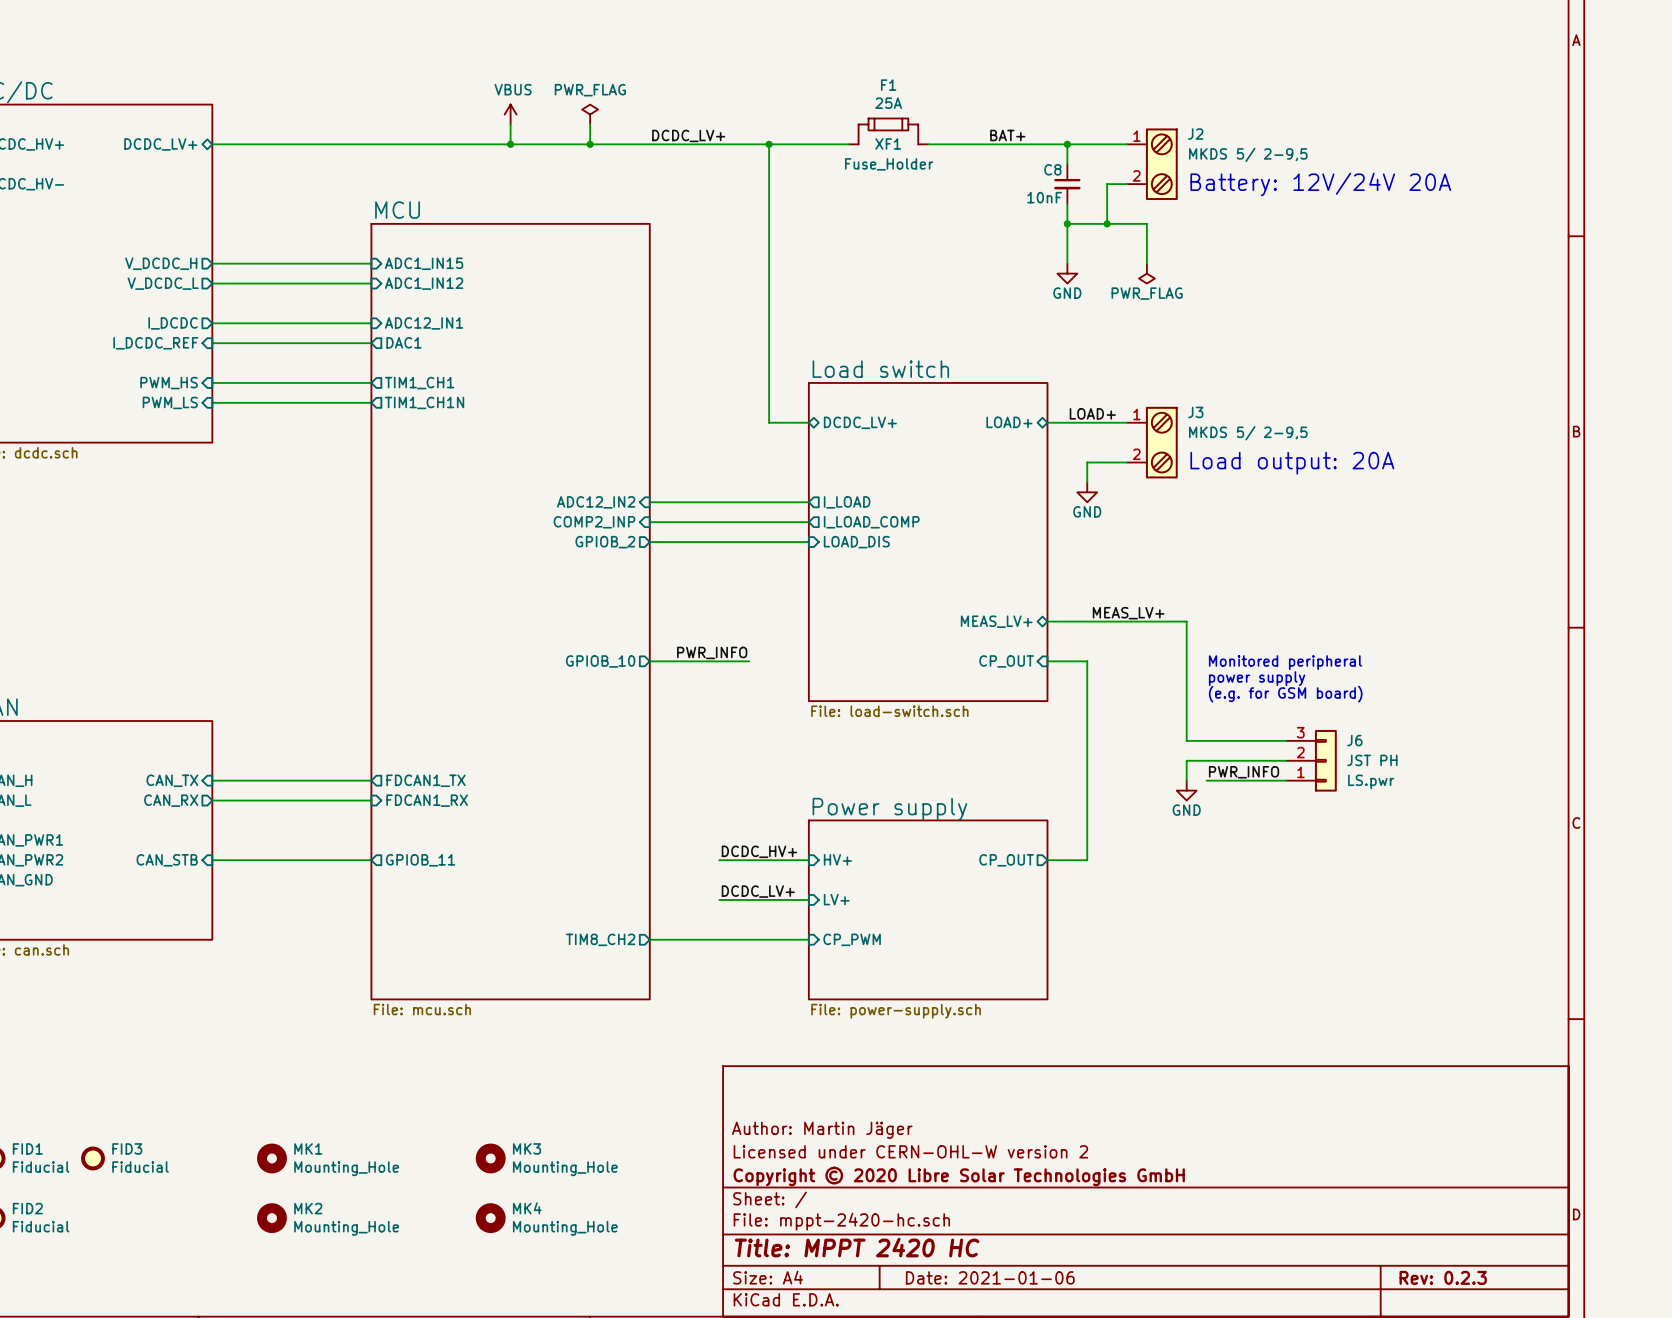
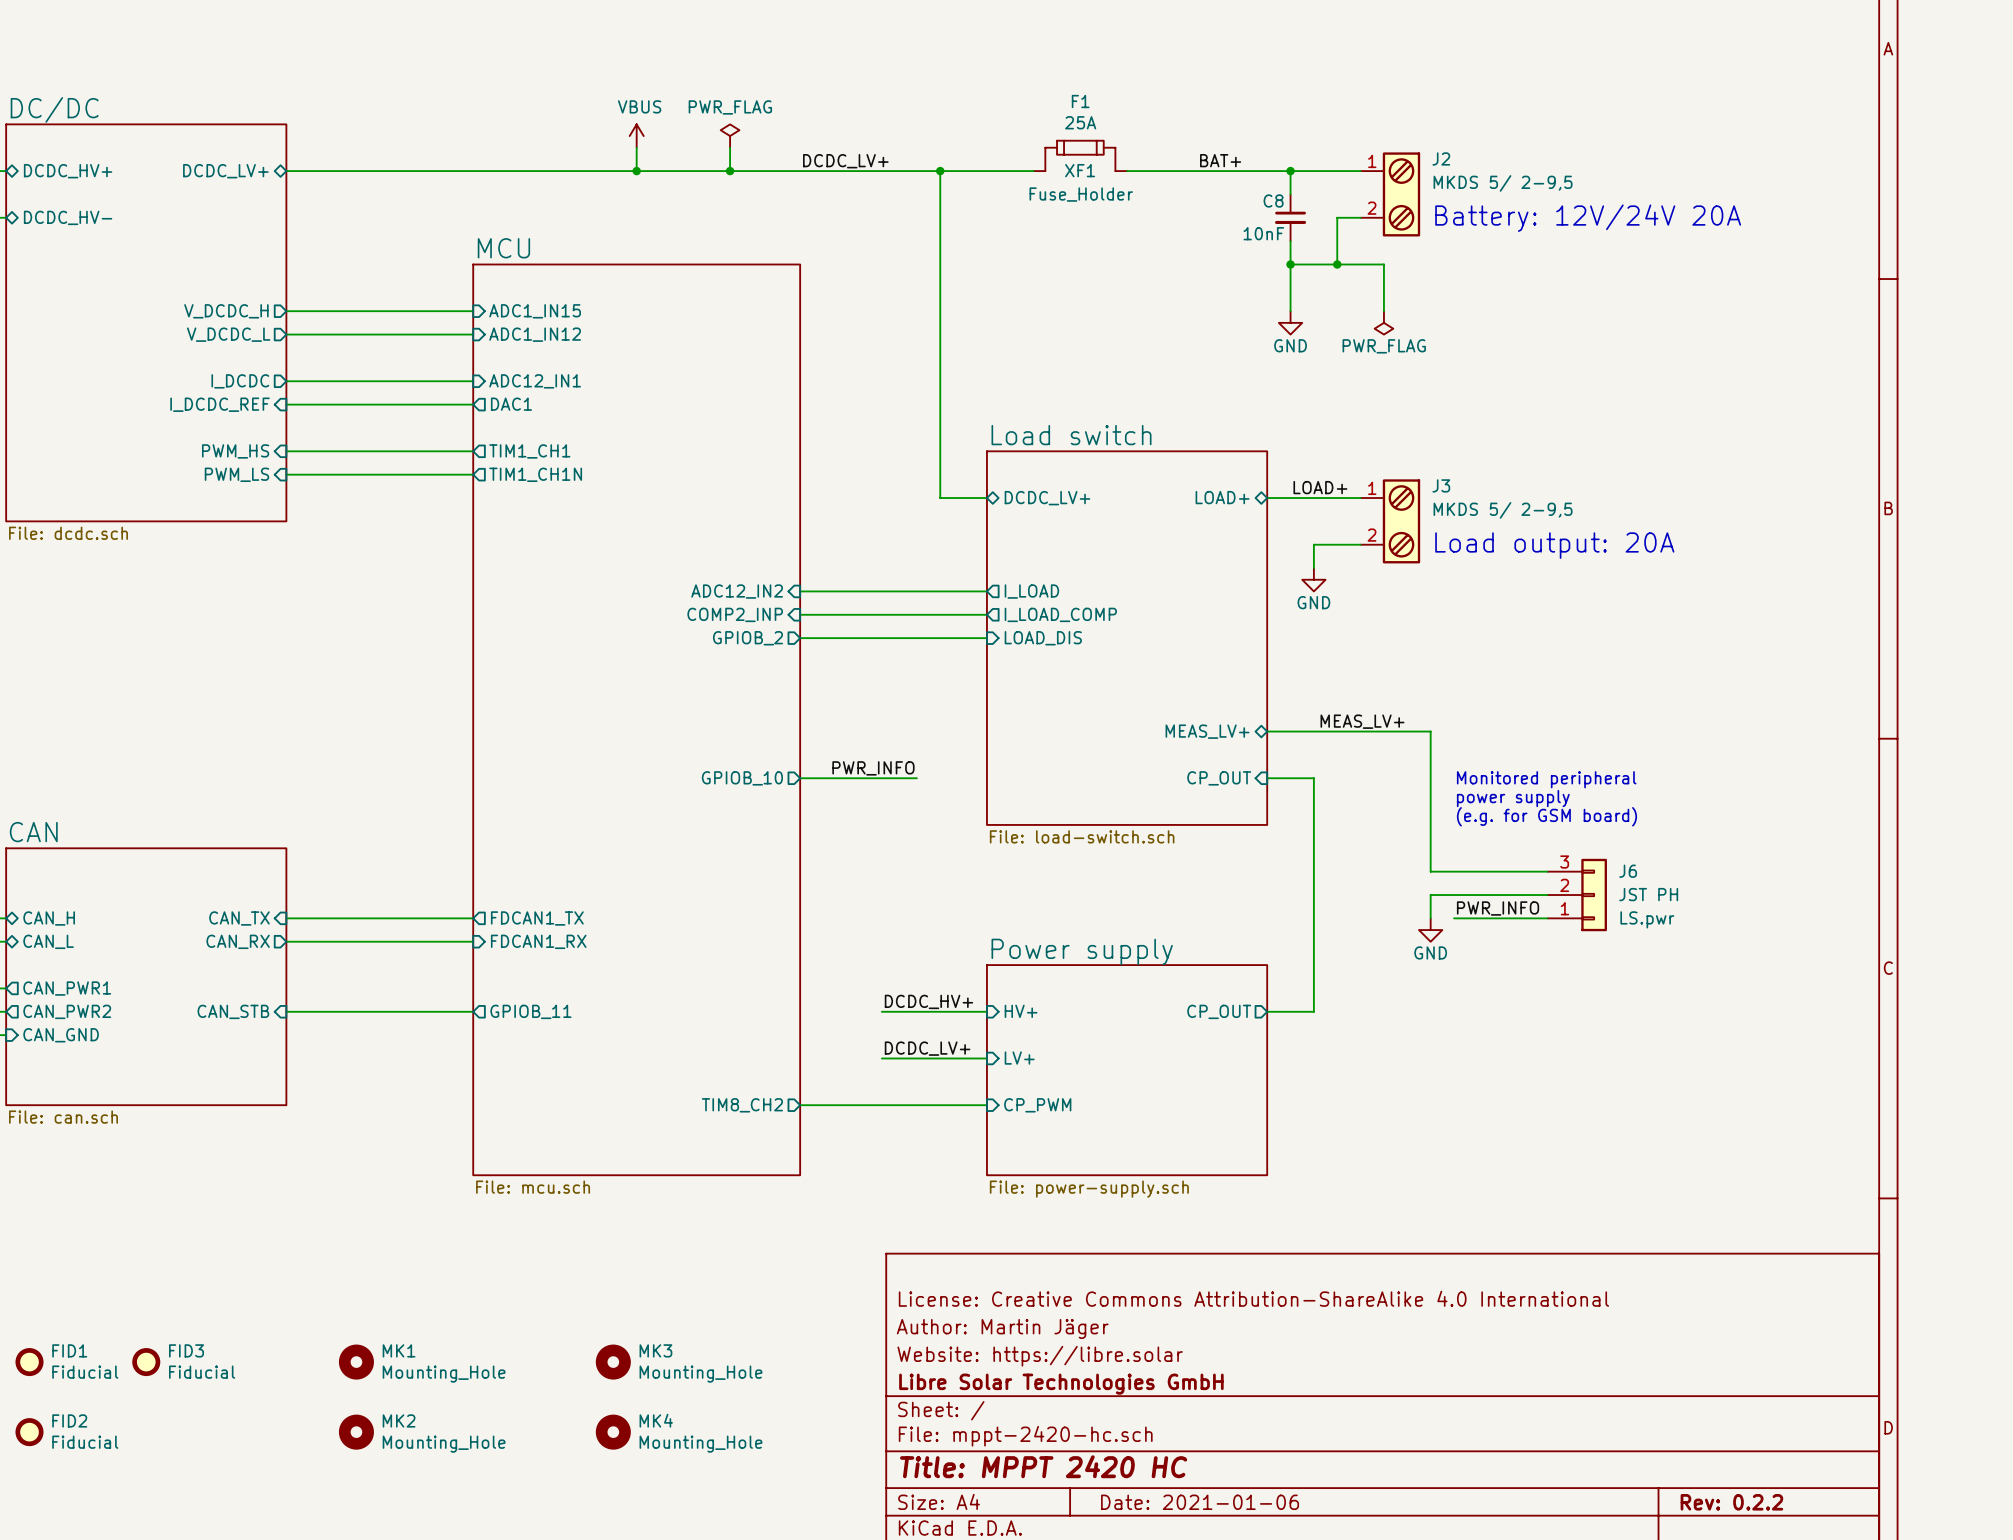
title block: none -> License: Creative Commons Attribution-ShareAlike 4.0 International (1253, 1298)
title block: Licensed under CERN-OHL-W version 2 (910, 1151) -> Website: https://libre.solar (1040, 1356)
title block: Copyright © 2020 Libre Solar Technologies GmbH (959, 1176) -> Libre Solar Technologies GmbH (1061, 1384)
title block: Rev: 0.2.3 (1443, 1277) -> Rev: 0.2.2 (1731, 1502)

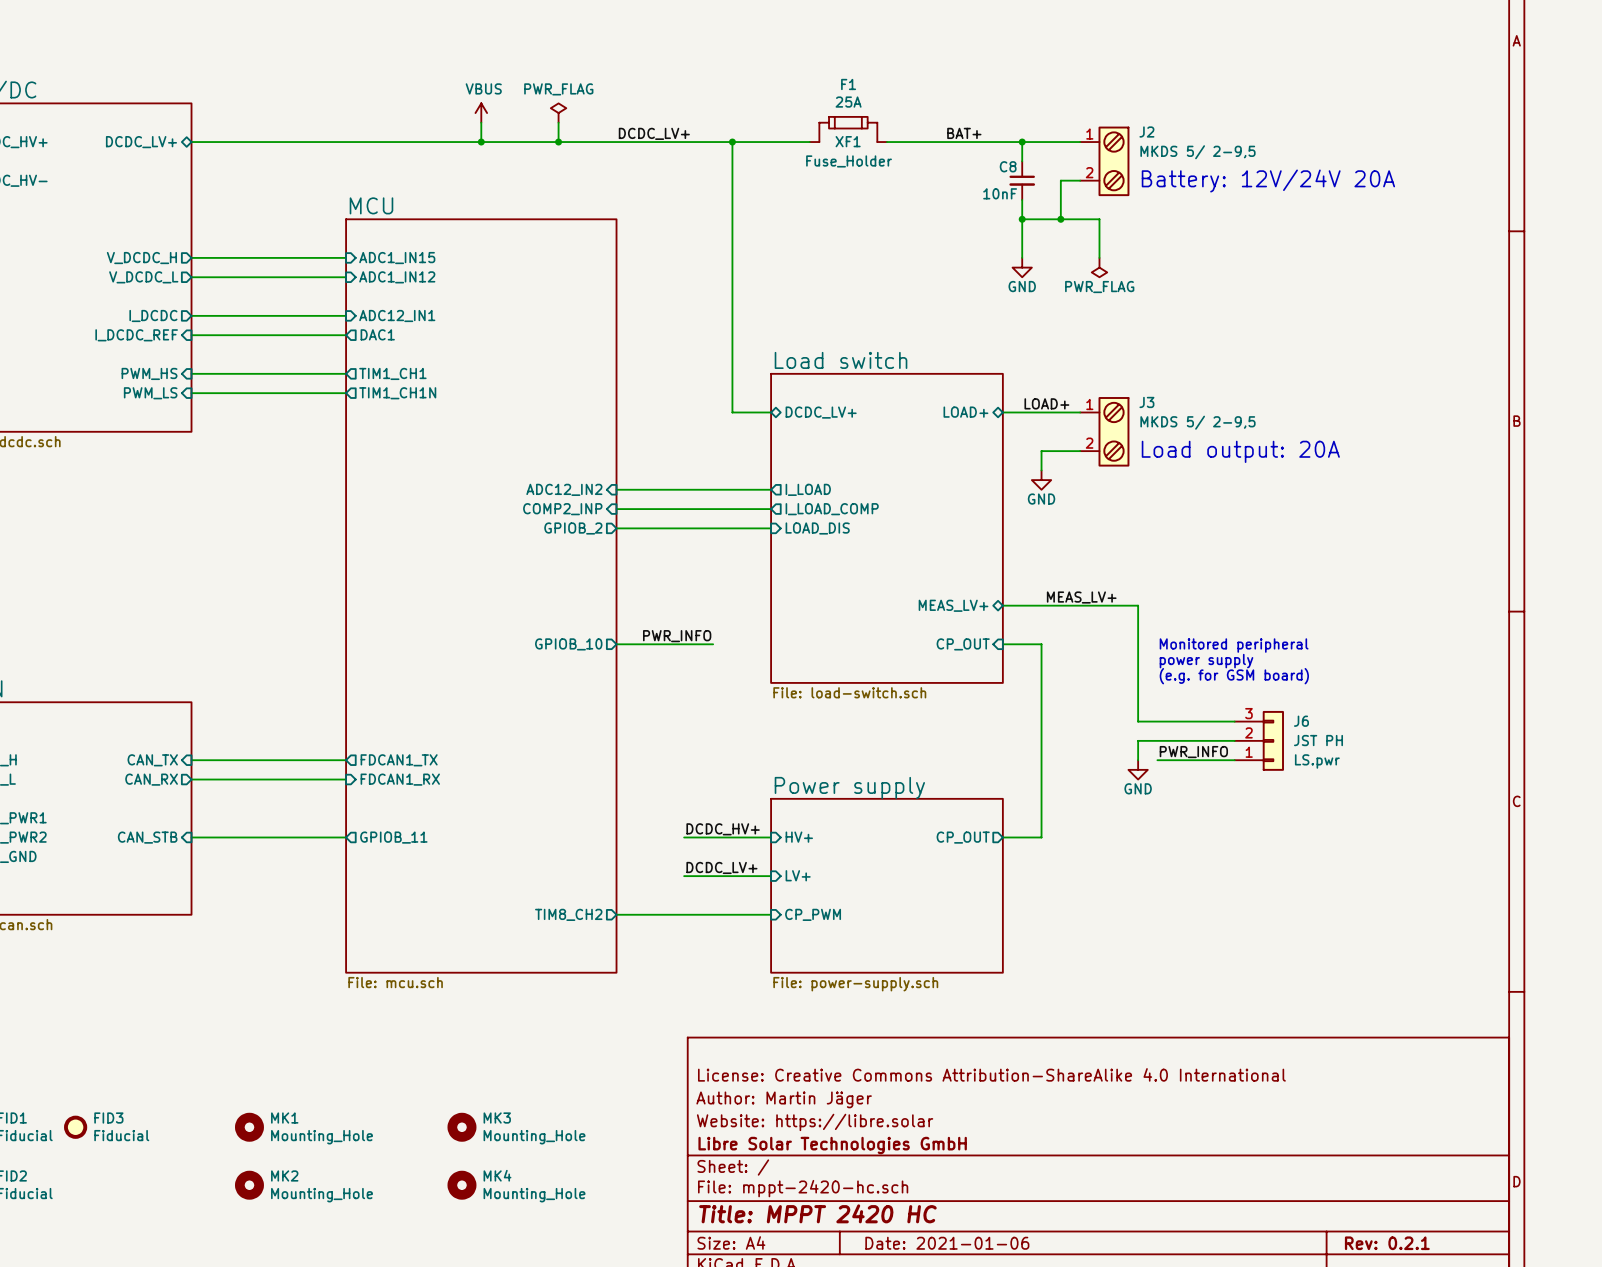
title block: Rev: 0.2.2 (1731, 1502) -> Rev: 0.2.1 (1387, 1243)

